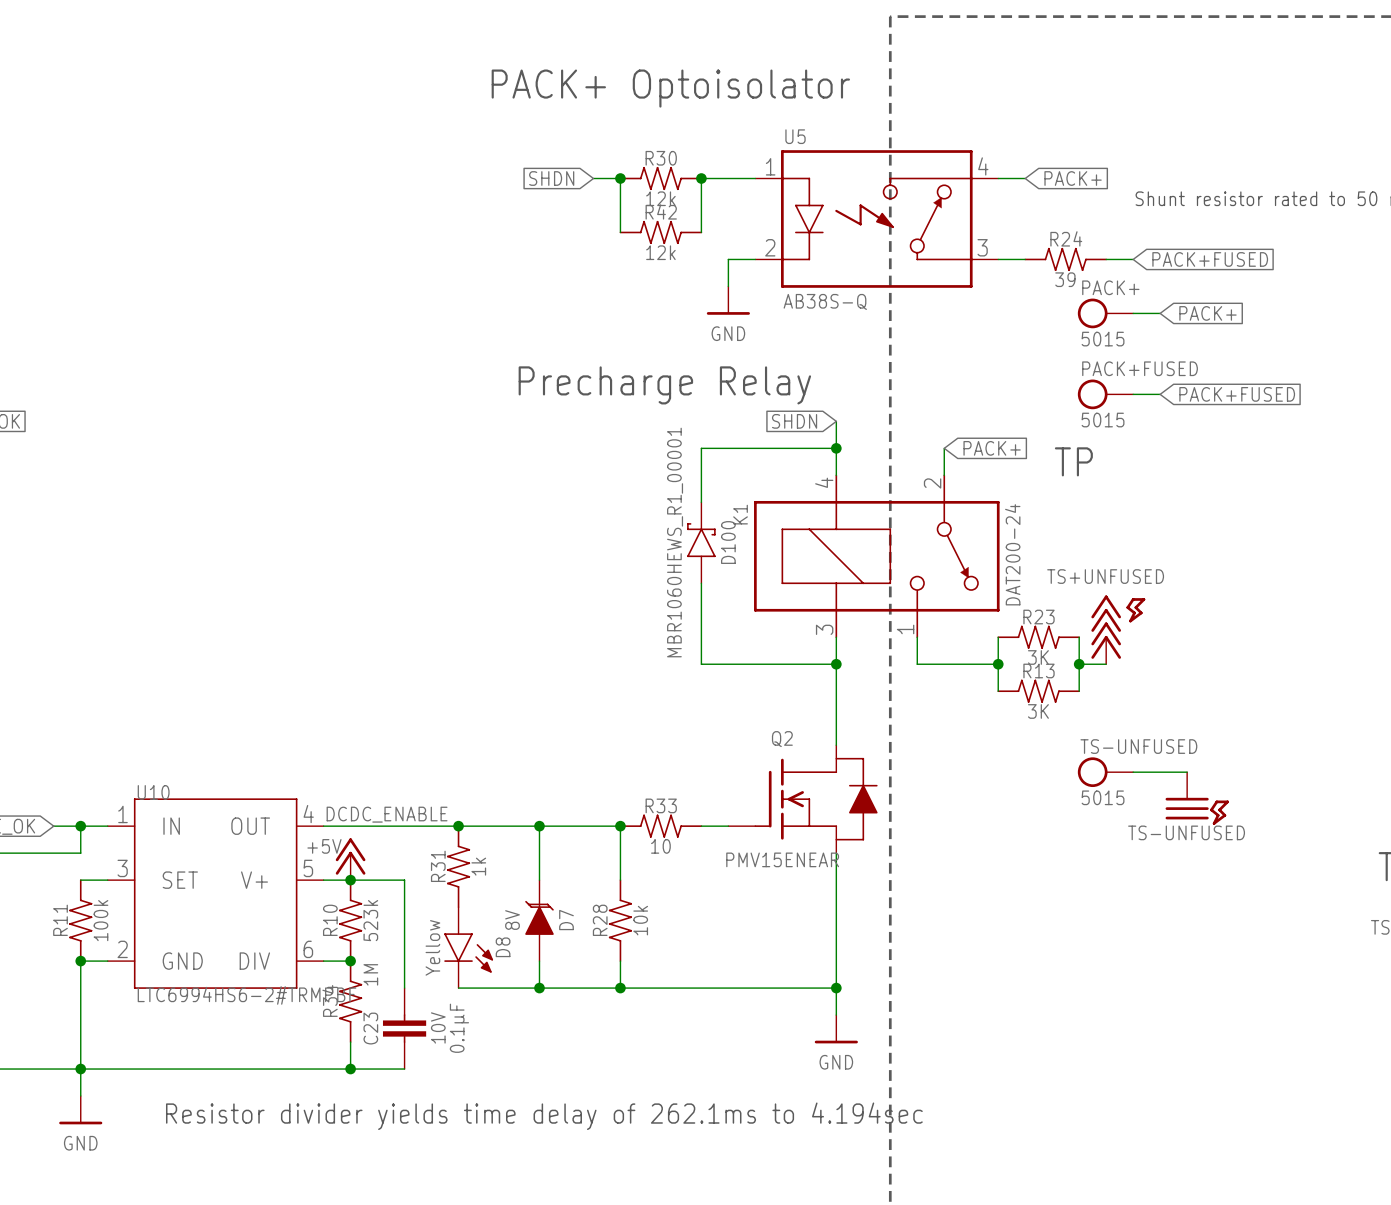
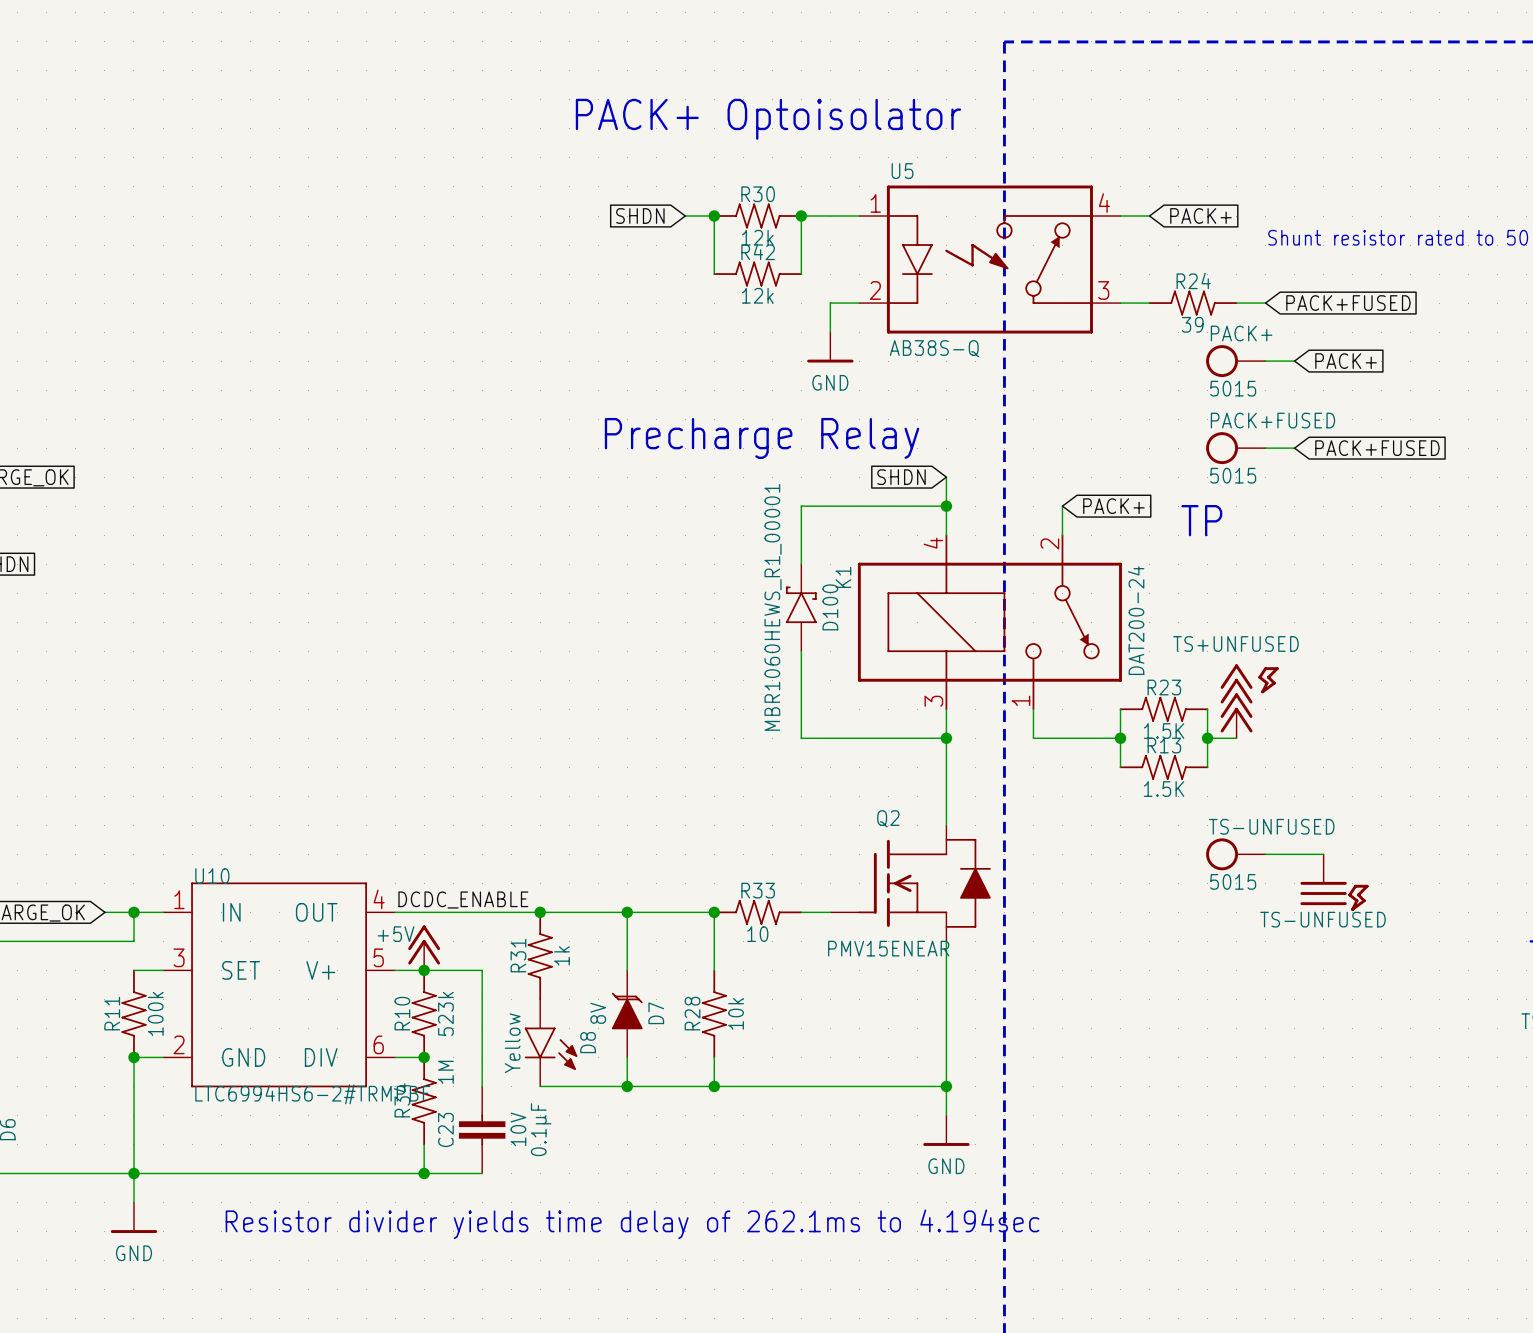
R23 text: 3K (1038, 657) -> 1.5K (1164, 731)
R13 text: 3K (1038, 711) -> 1.5K (1164, 789)

